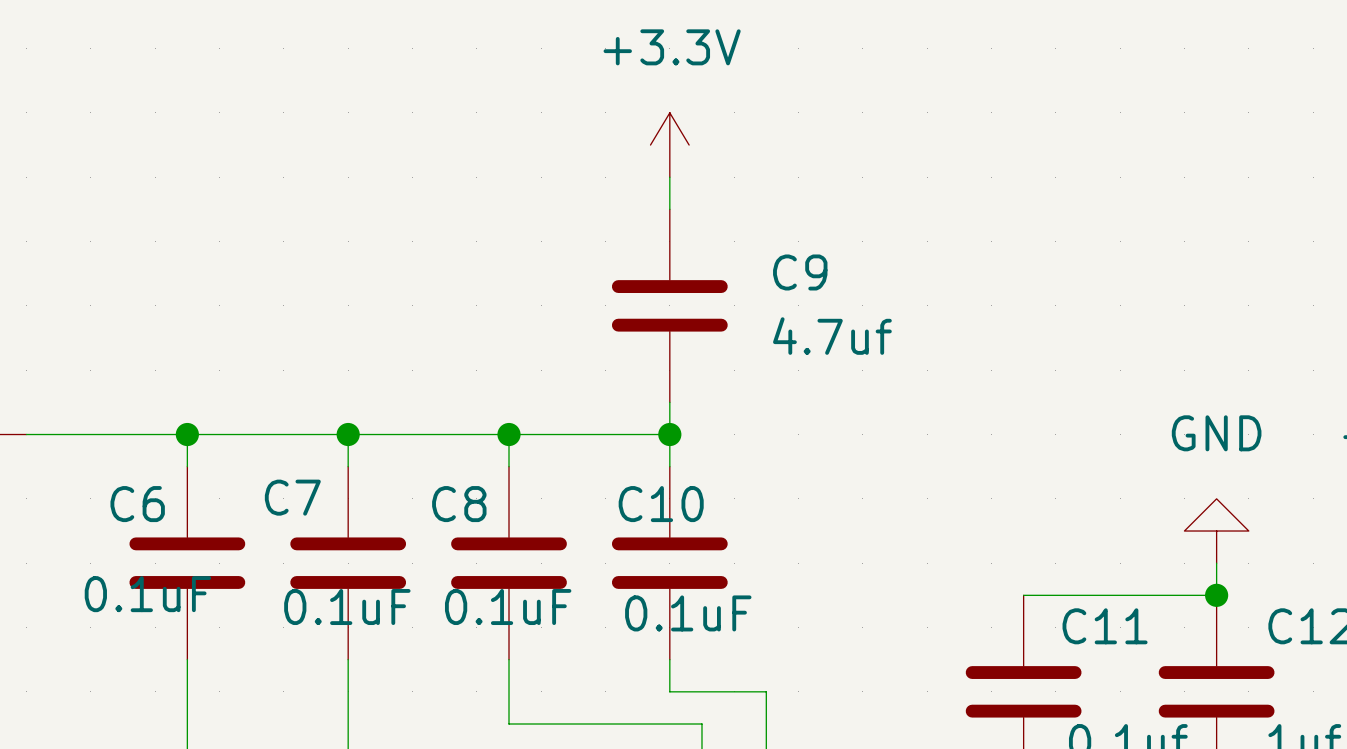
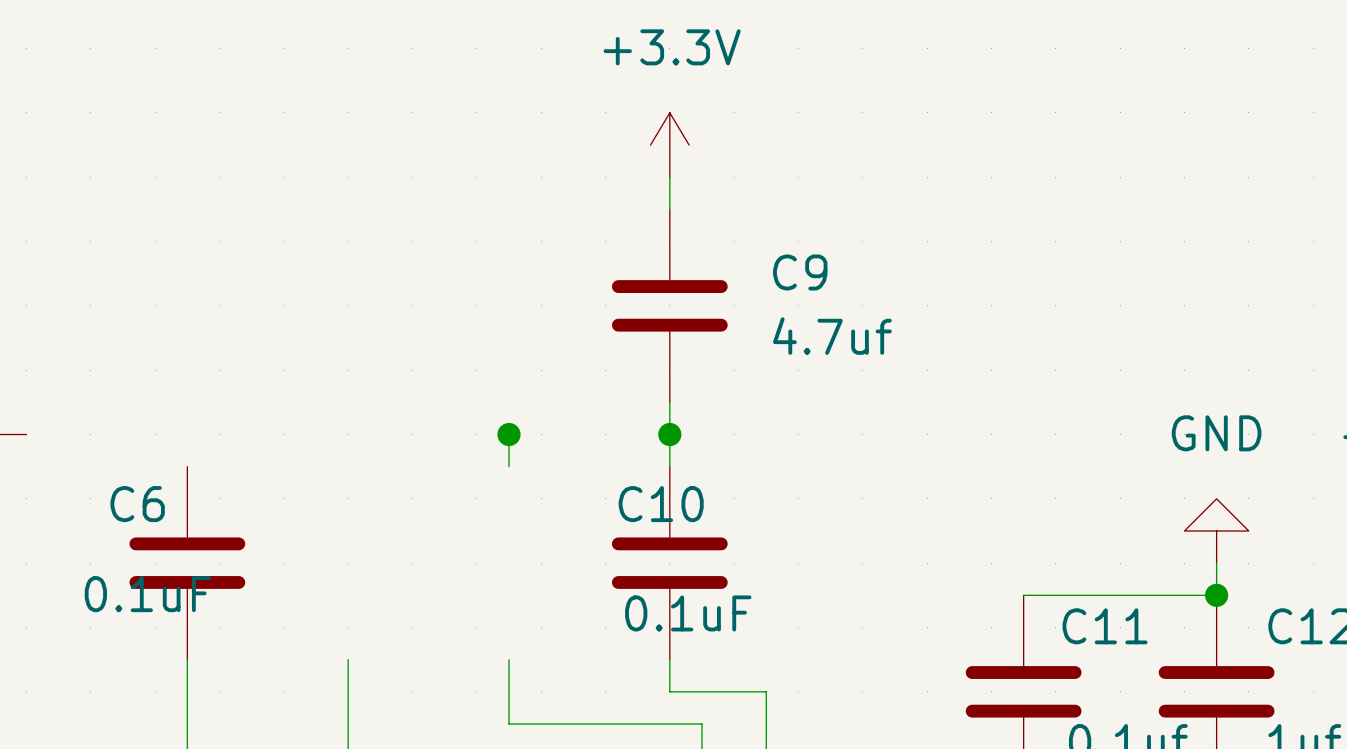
wire: (26, 434) (669, 434) -> none
wire: (187, 434) (187, 466) -> none
junction: (187, 434) -> none
wire: (348, 434) (348, 466) -> none
junction: (348, 434) -> none
C7: 0.1uF (348, 563) -> none
C8: 0.1uF (509, 563) -> none

